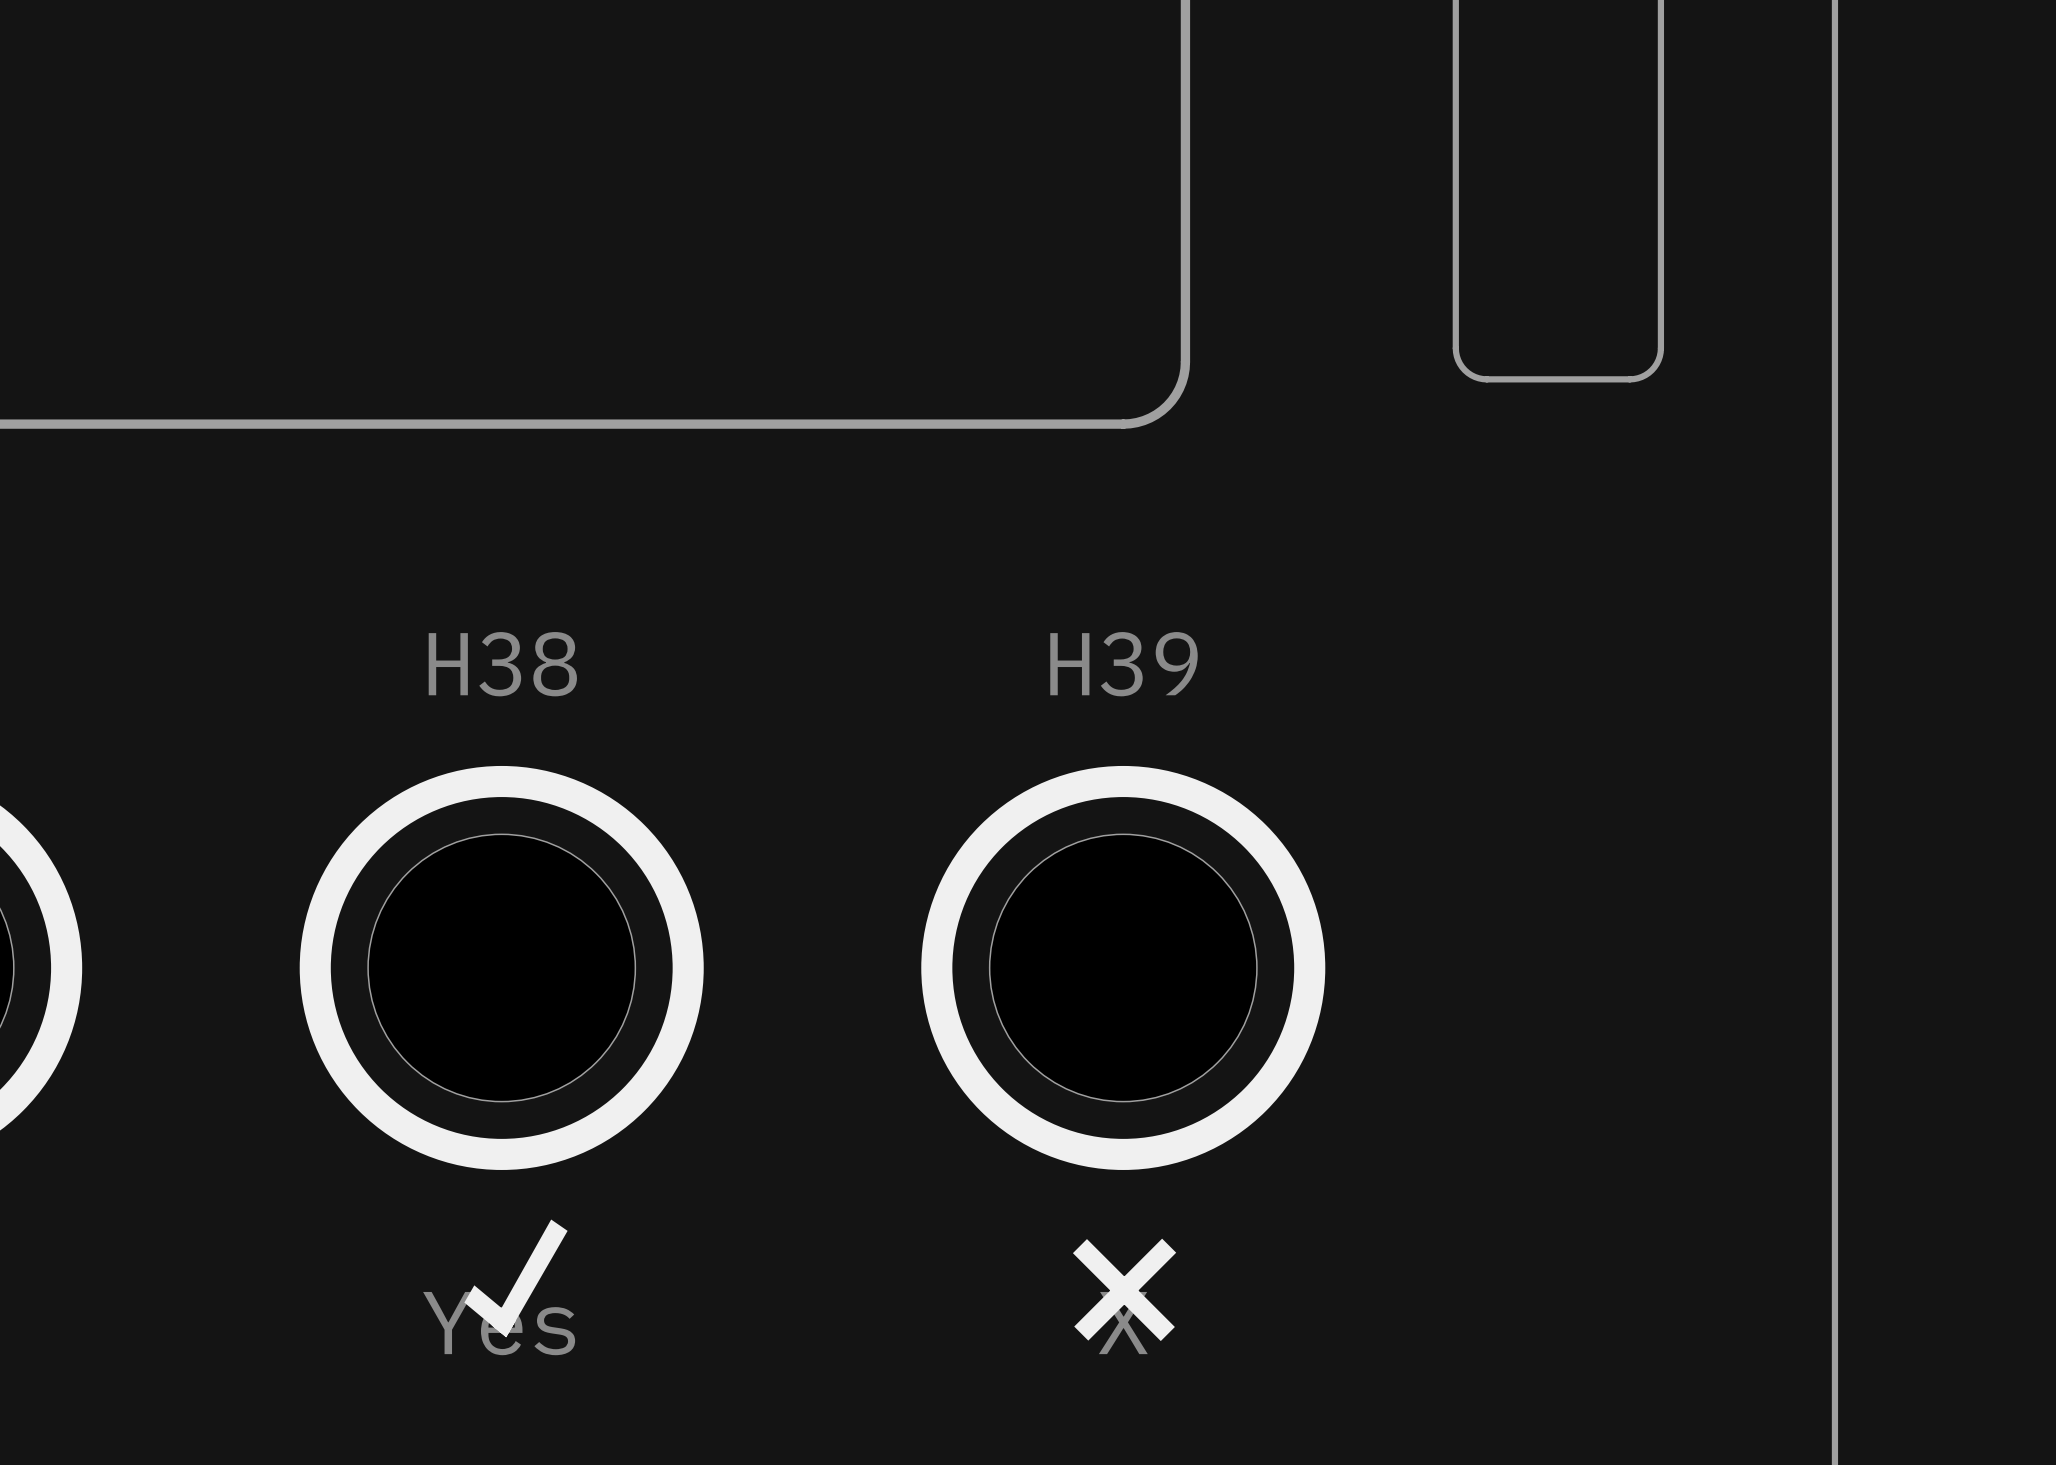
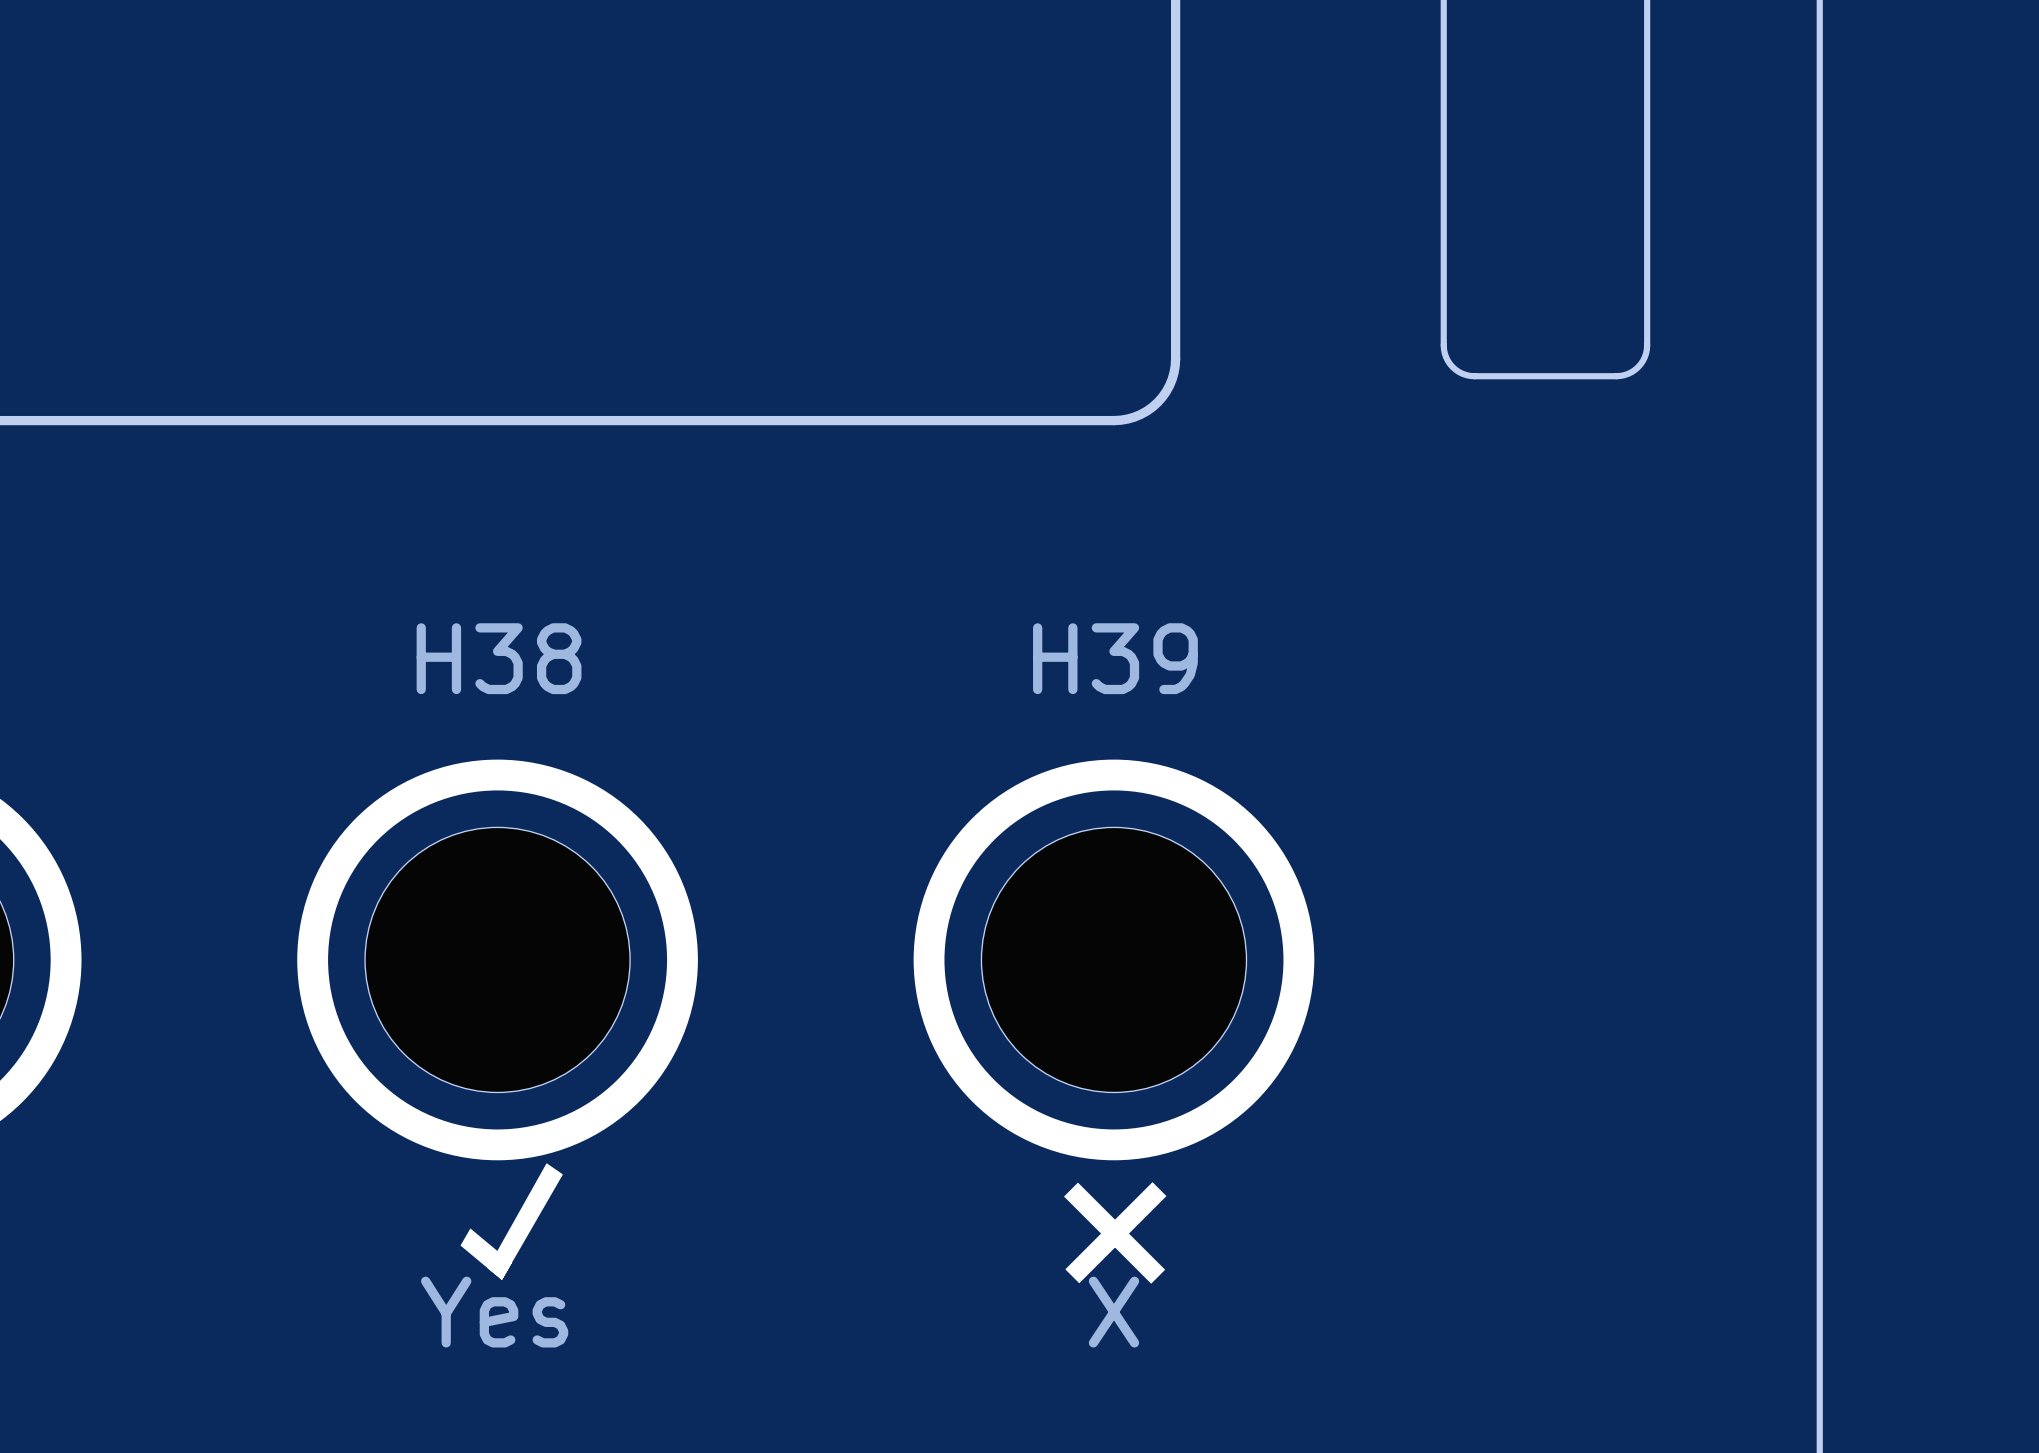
drawing position: (529, 1278) -> (525, 1221)
drawing position: (1125, 1289) -> (1115, 1232)
drawing position: (1123, 1290) -> (1114, 1233)
drawing position: (490, 1311) -> (486, 1254)

